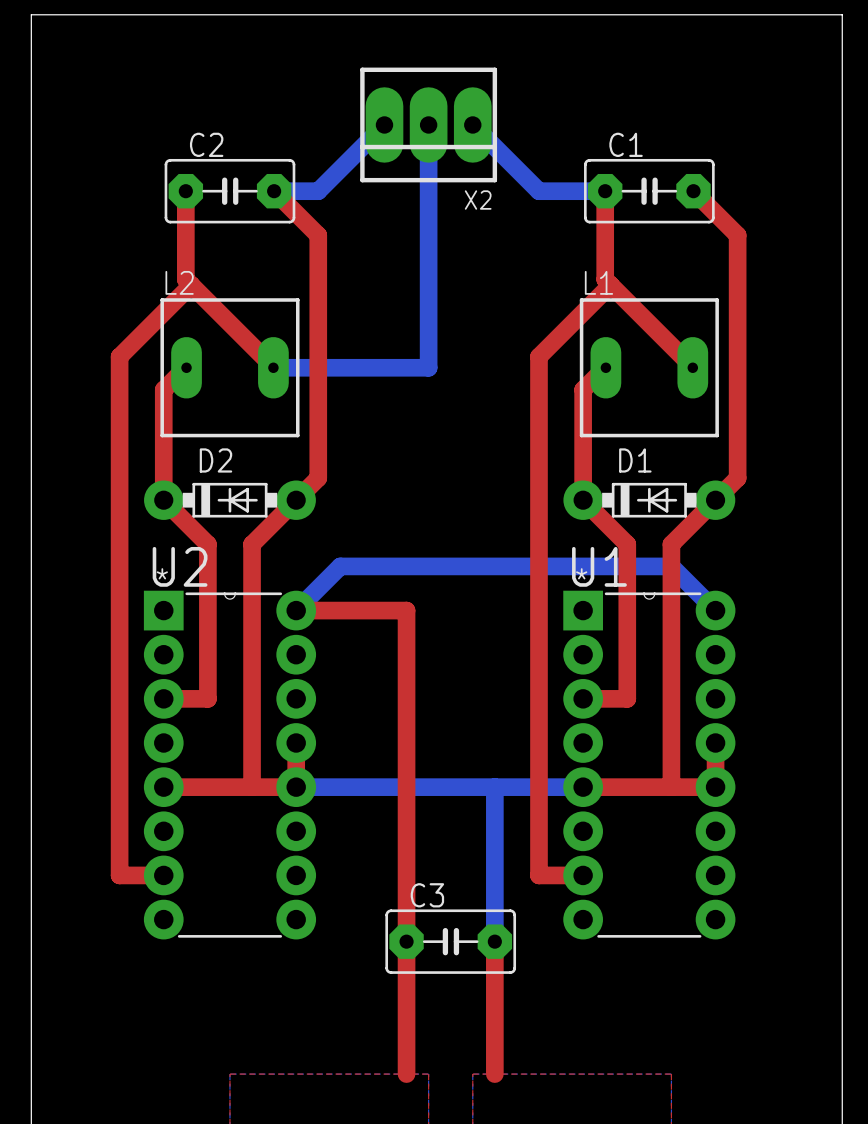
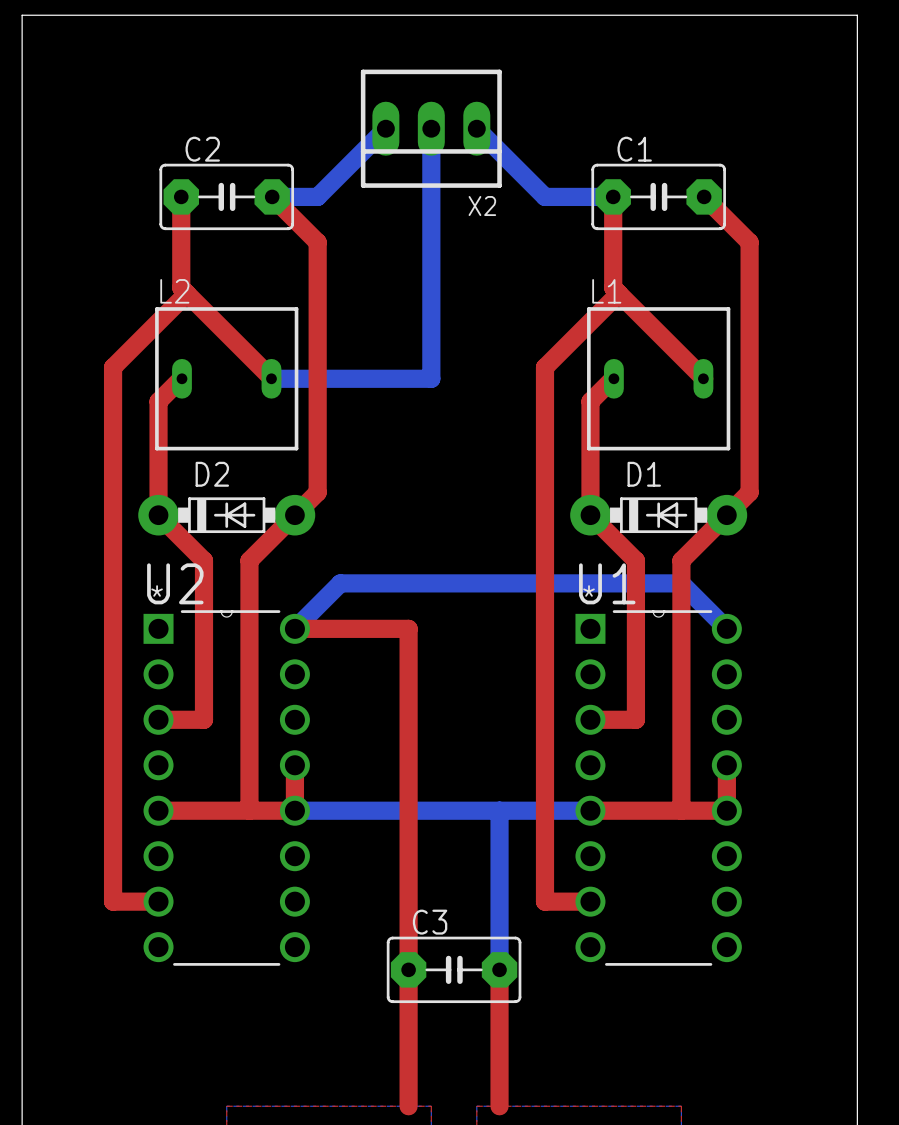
X2 footprint: [360, 67, 498, 183] -> [360, 69, 502, 188]
L2 footprint: [160, 298, 300, 438] -> [155, 307, 299, 451]
L1 footprint: [579, 298, 719, 438] -> [587, 307, 731, 451]
U2 footprint: [143, 590, 317, 940] -> [143, 610, 310, 966]
U1 footprint: [563, 590, 736, 940] -> [575, 610, 742, 966]

